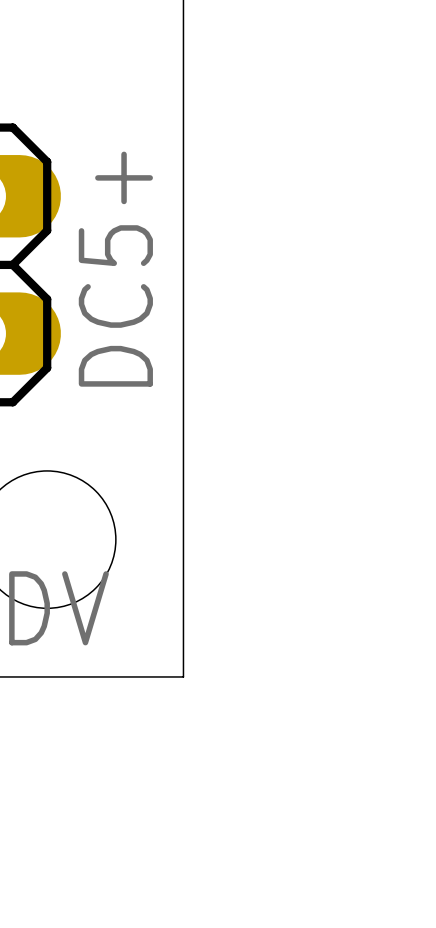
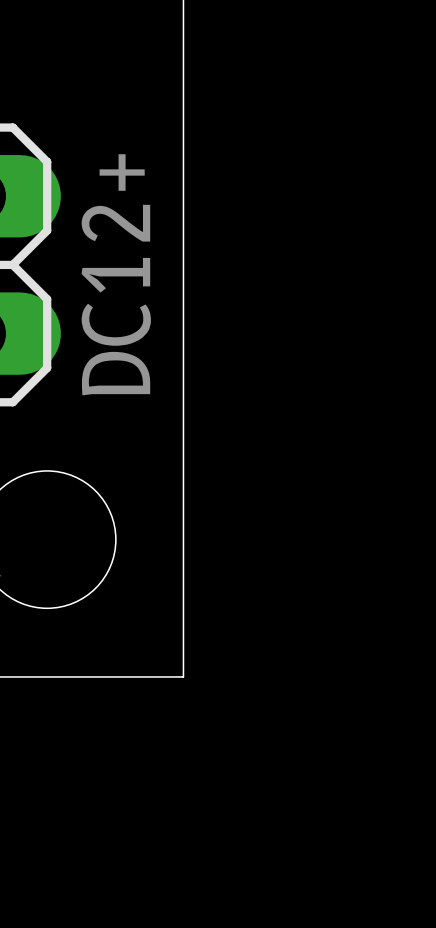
part value: DC5+ (115, 269) -> DC12+ (116, 274)

